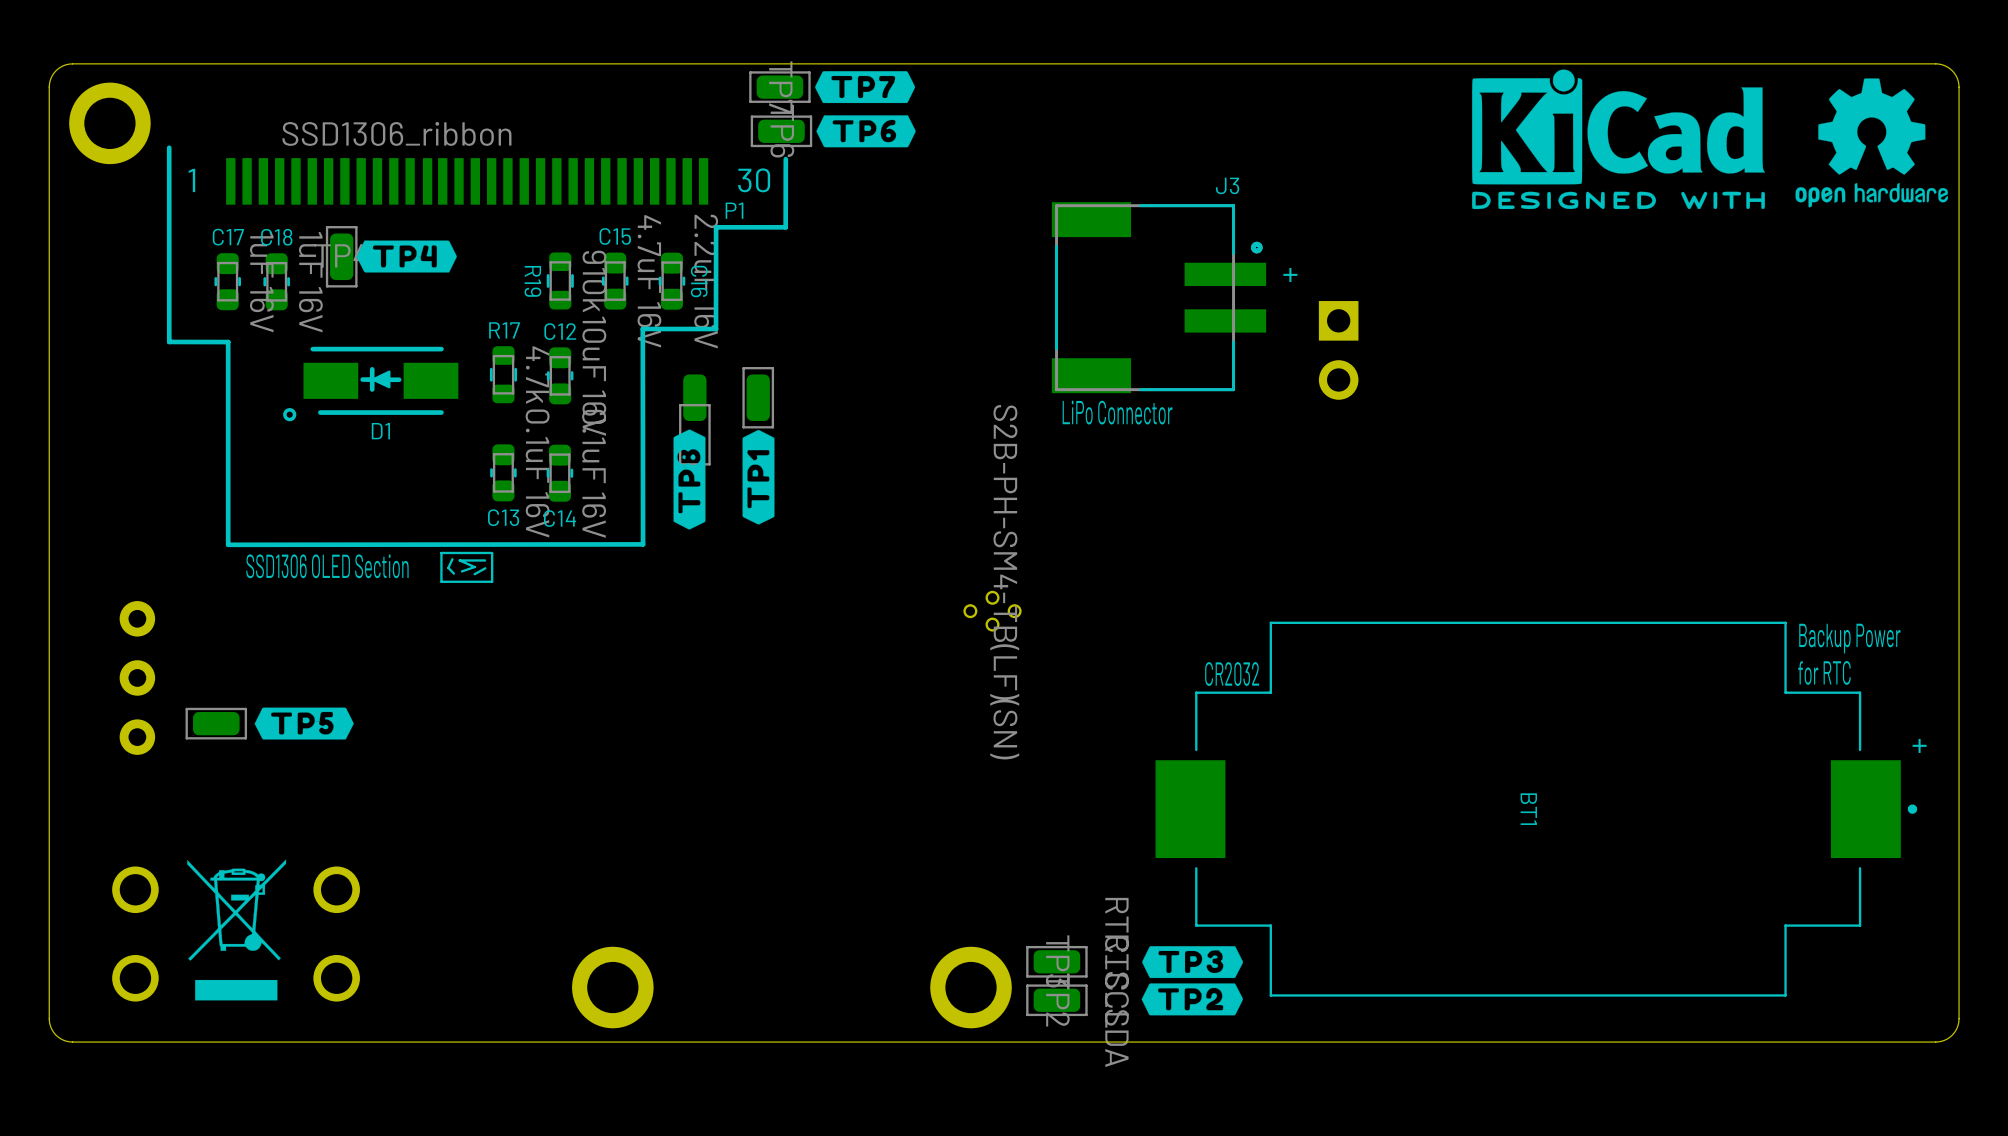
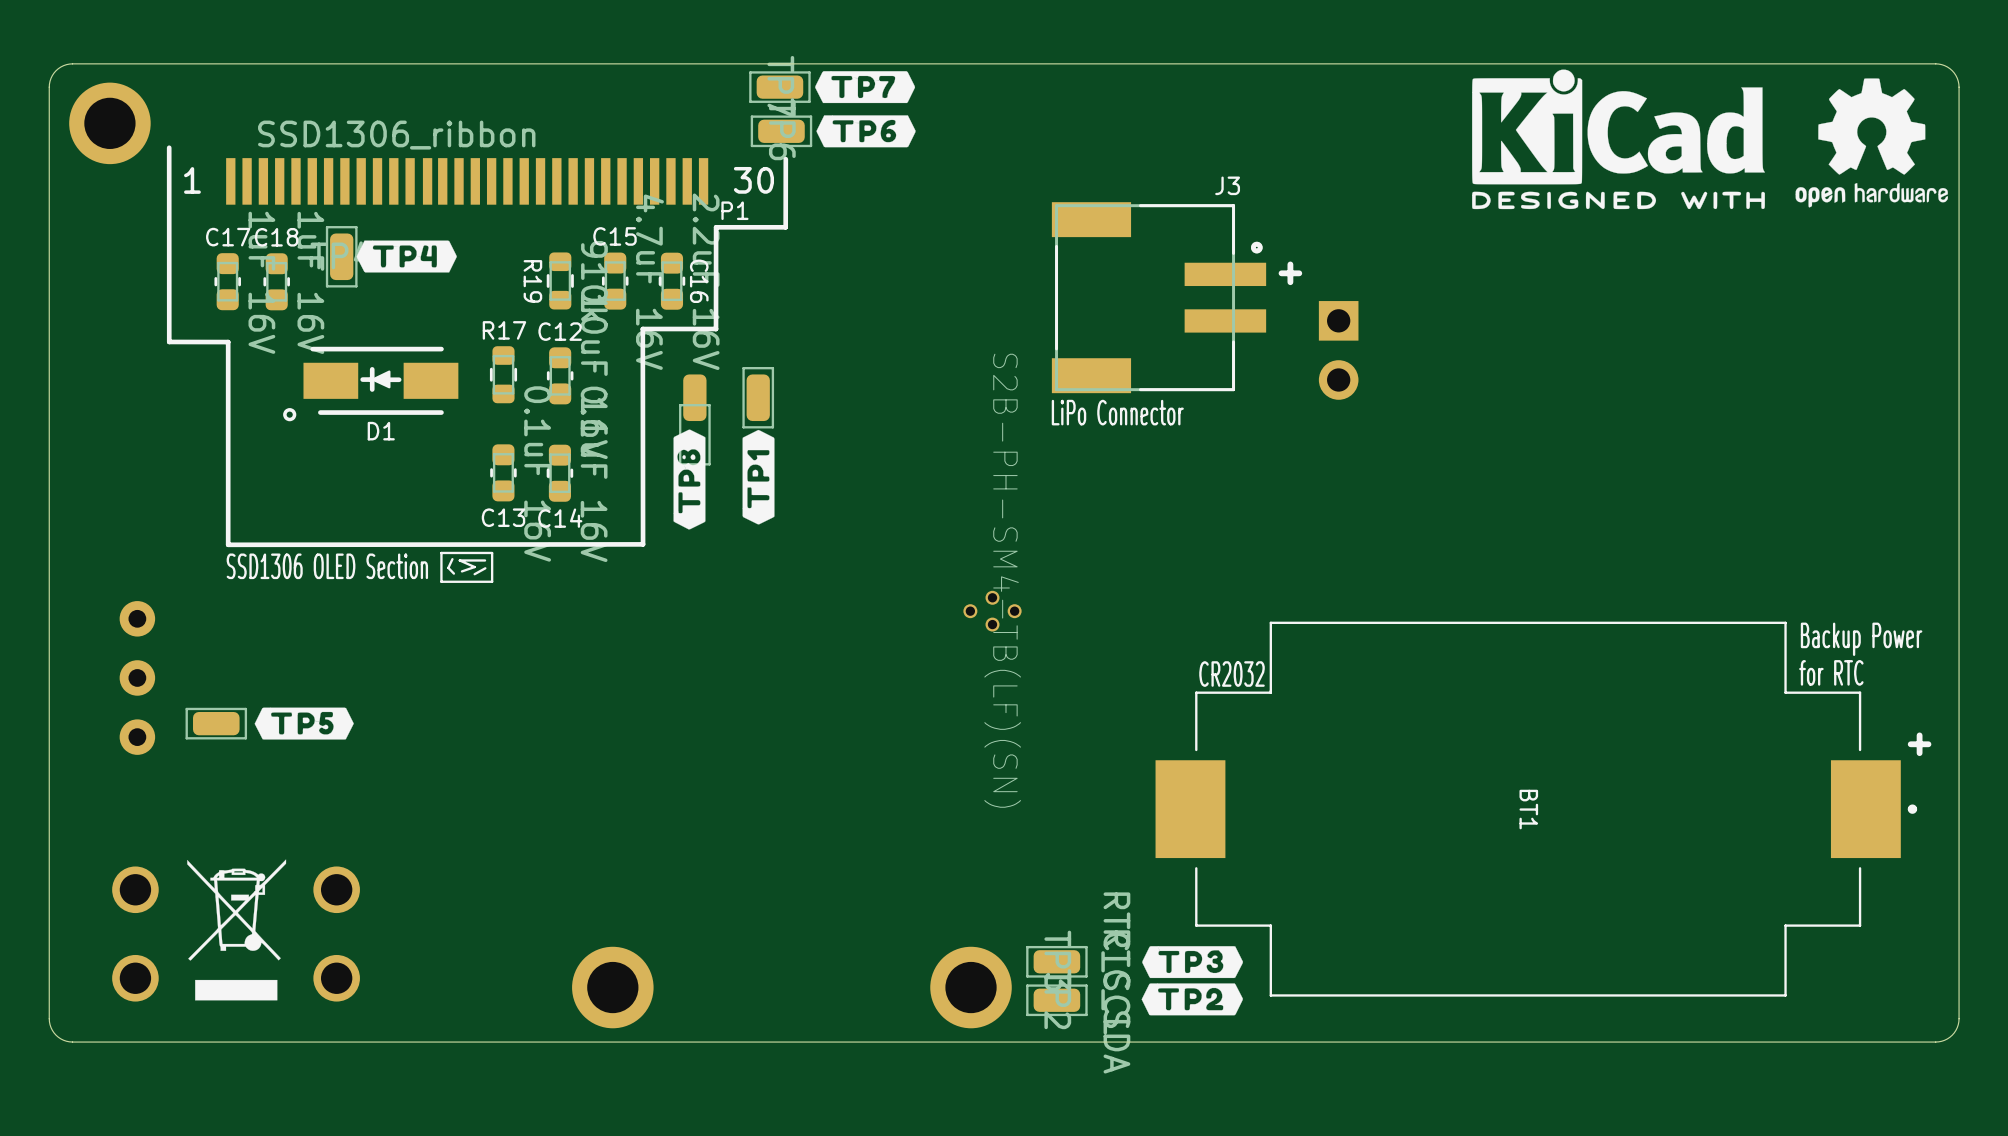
R17 value: 4.7k (537, 375) -> none

